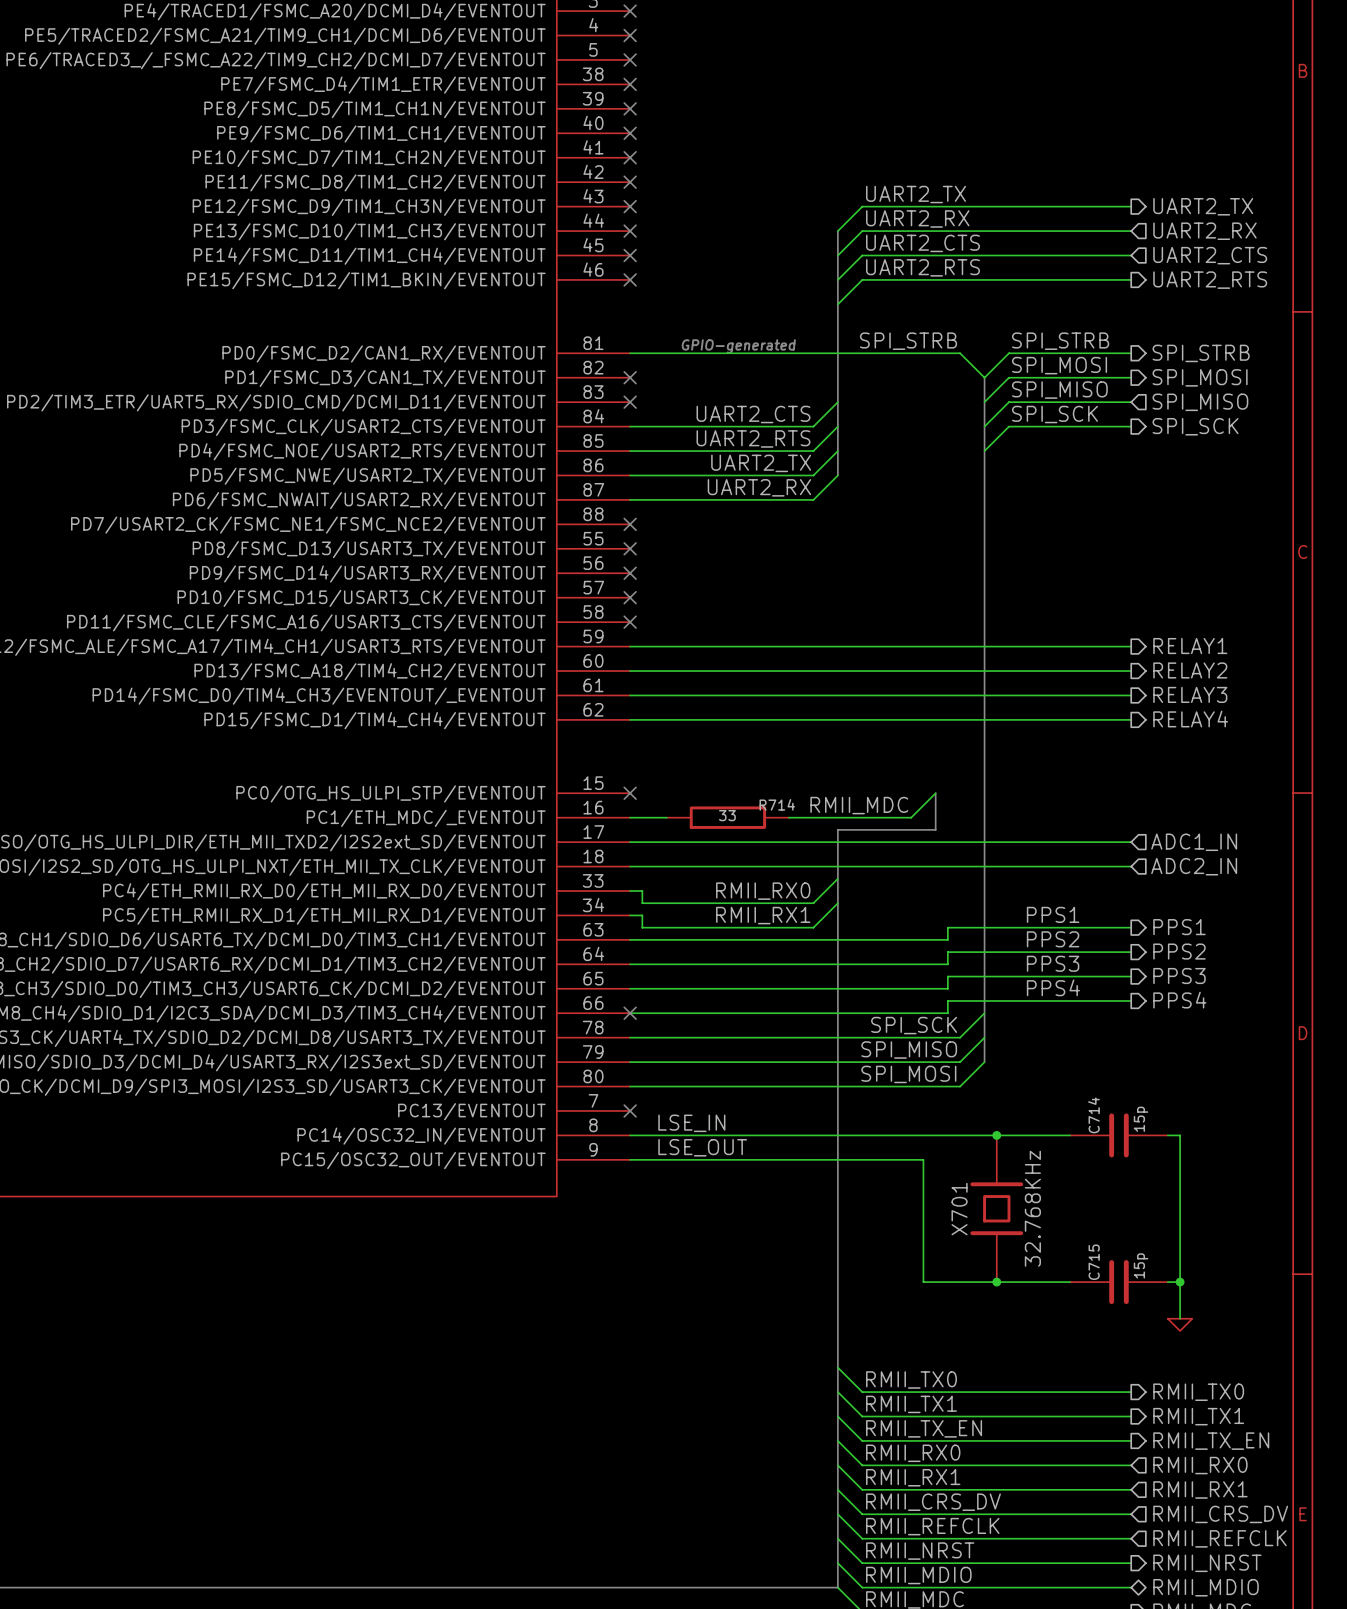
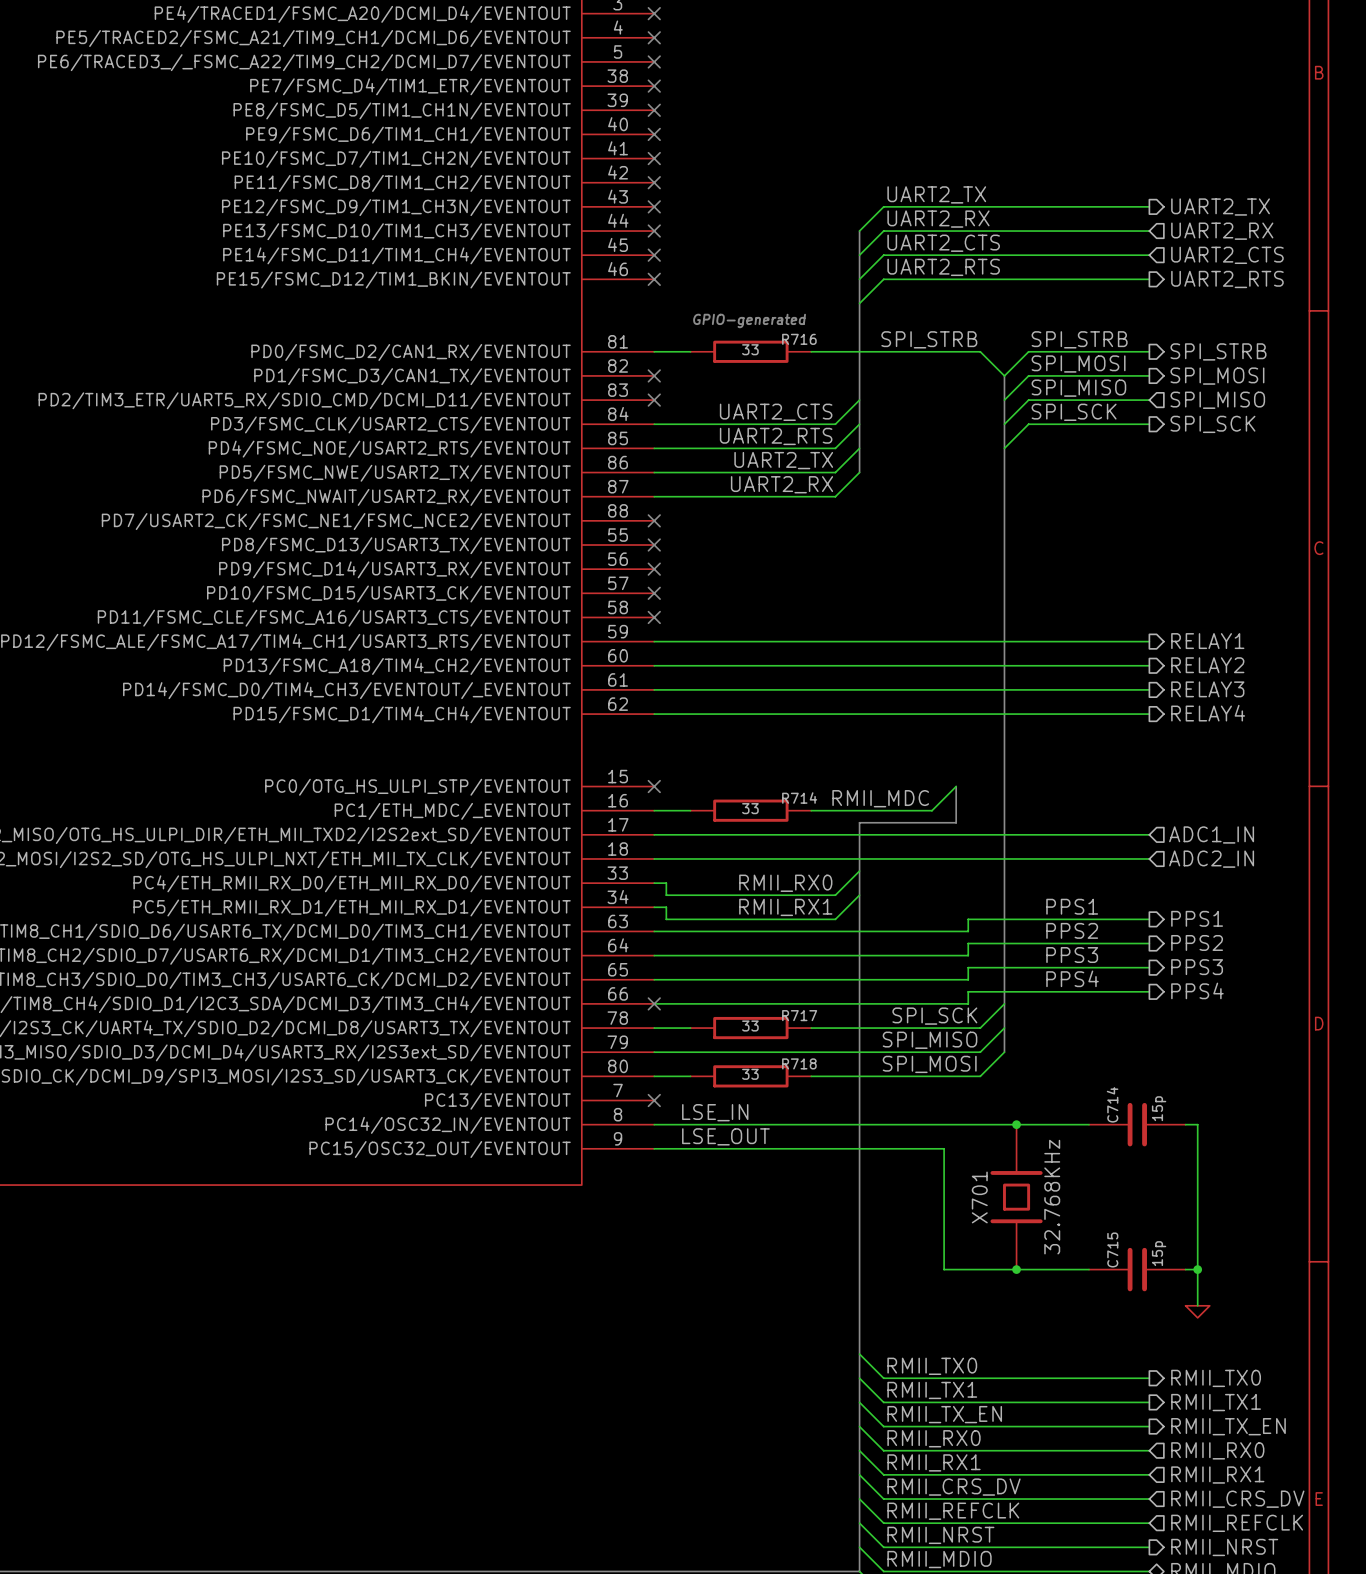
text position: GPIO-generated (738, 346) -> GPIO-generated (749, 320)
wire: (666, 353) (789, 353) -> none
R716: none -> 33 (750, 351)
wire: (666, 1037) (789, 1037) -> none
R717: none -> 33 (750, 1028)
wire: (666, 1086) (789, 1086) -> none
R718: none -> 33 (750, 1076)

